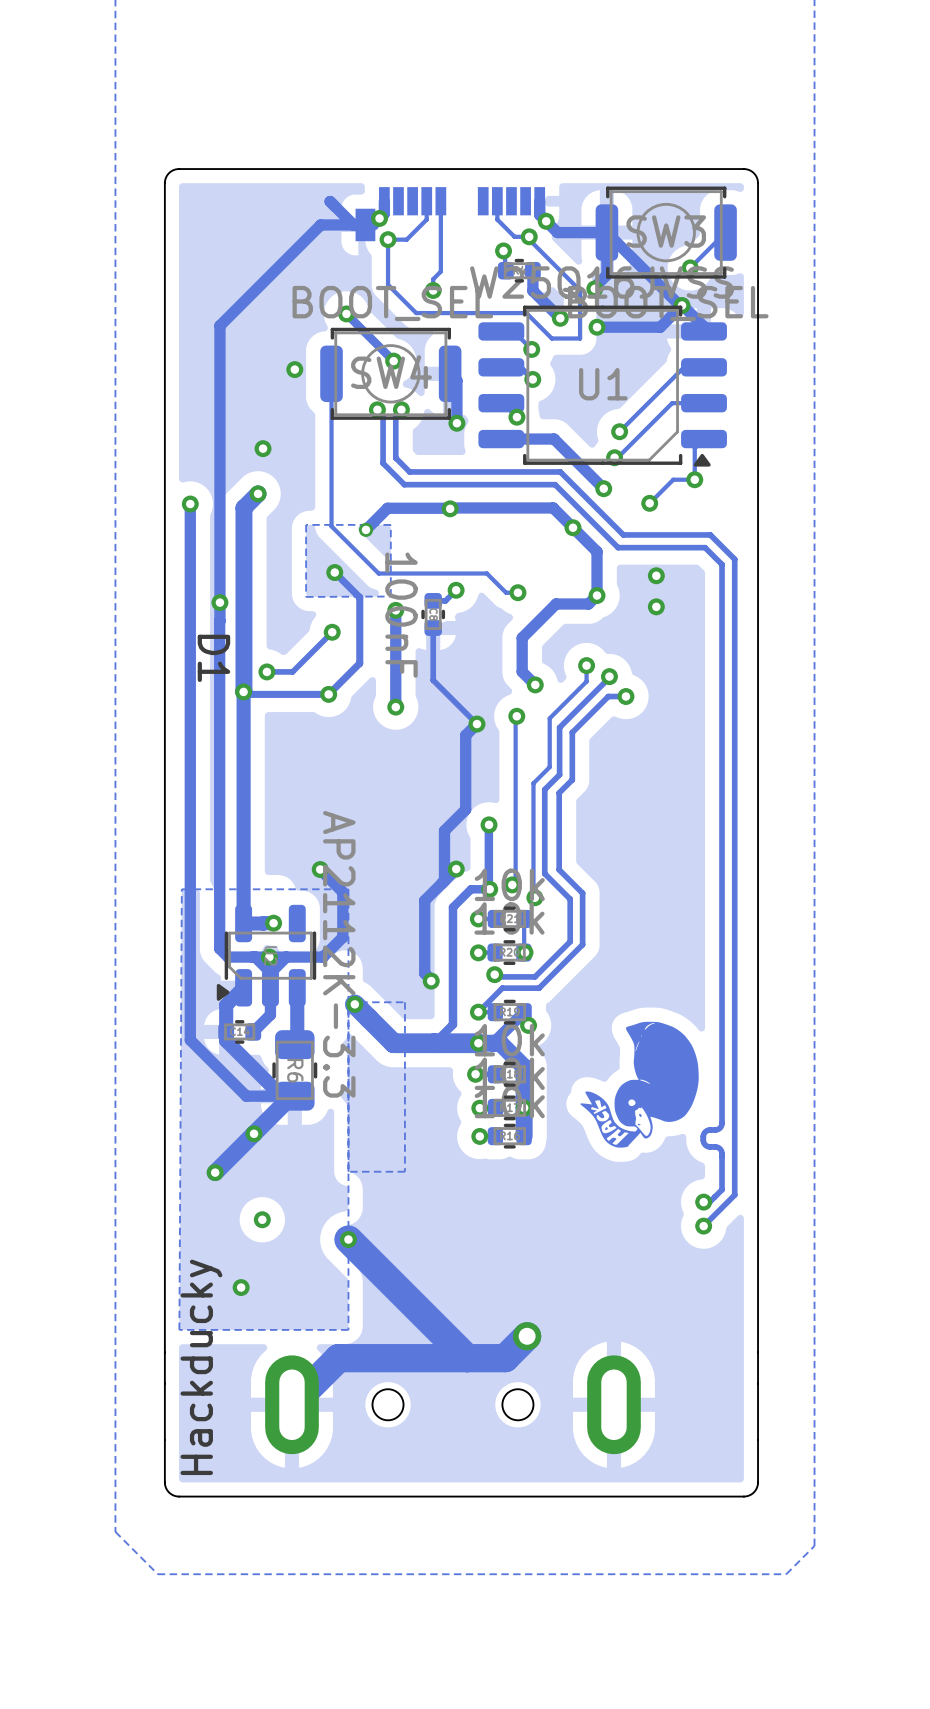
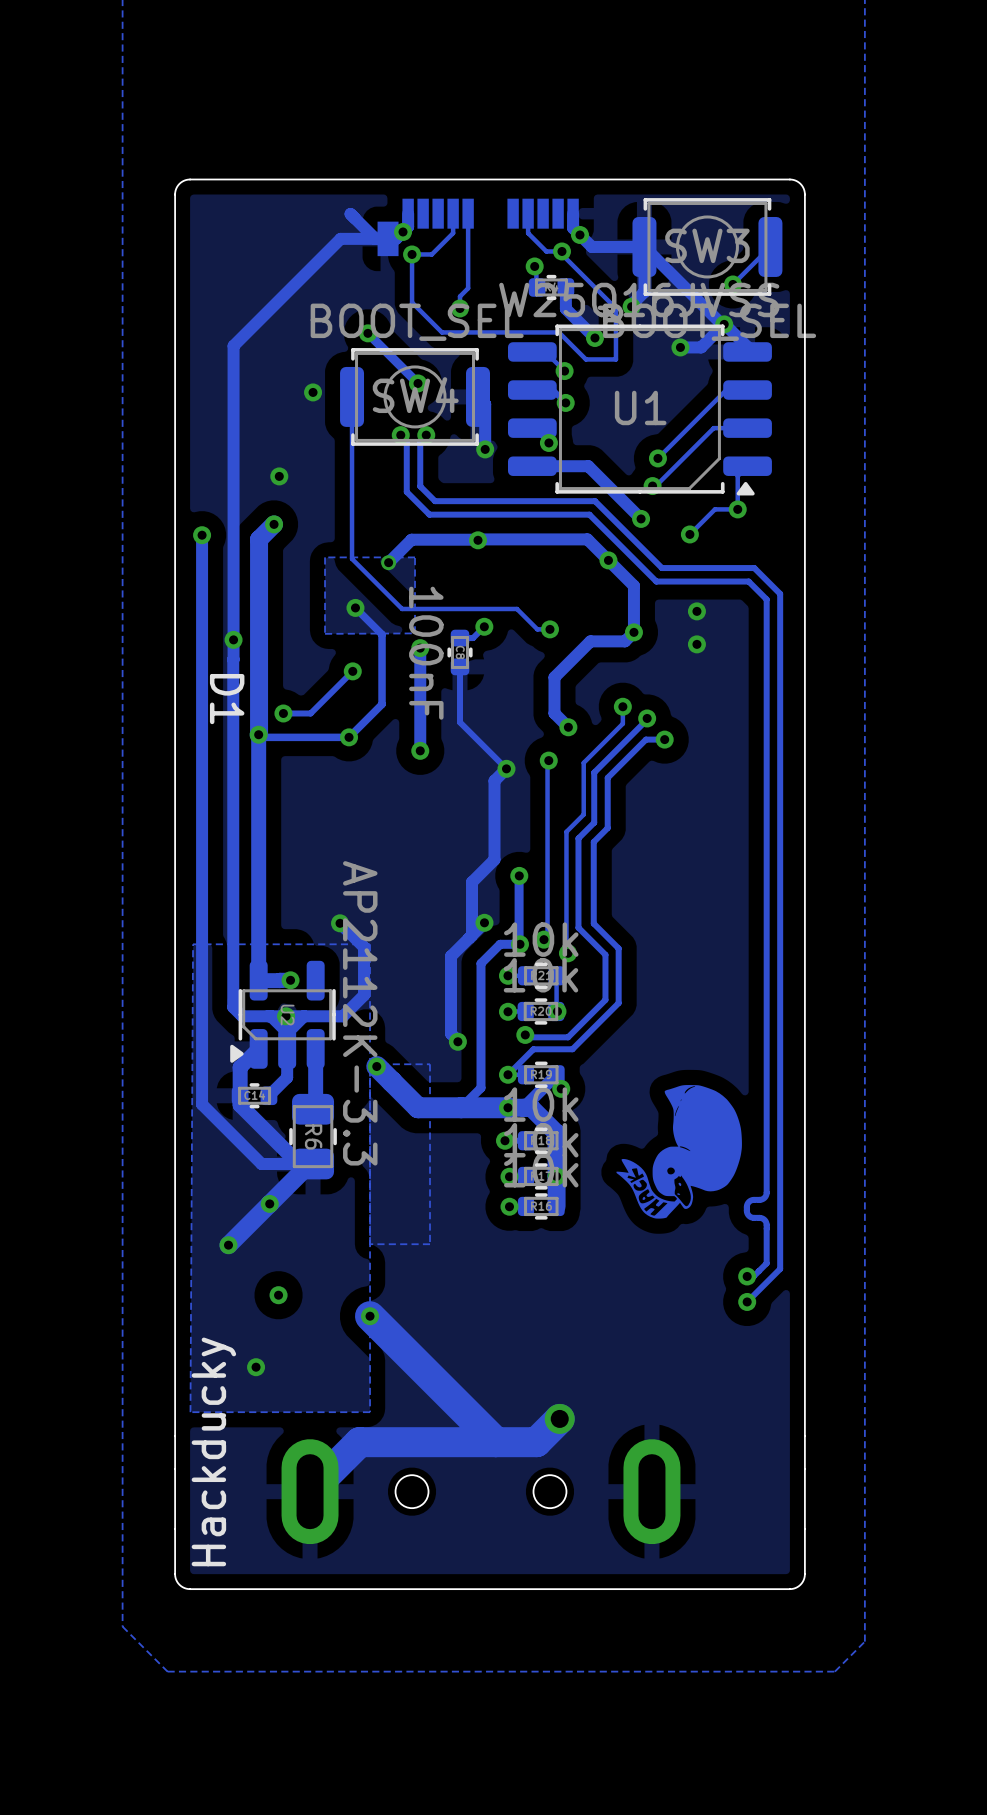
via position: (597, 327) -> (680, 347)
track: (640, 327) (597, 327) -> none

